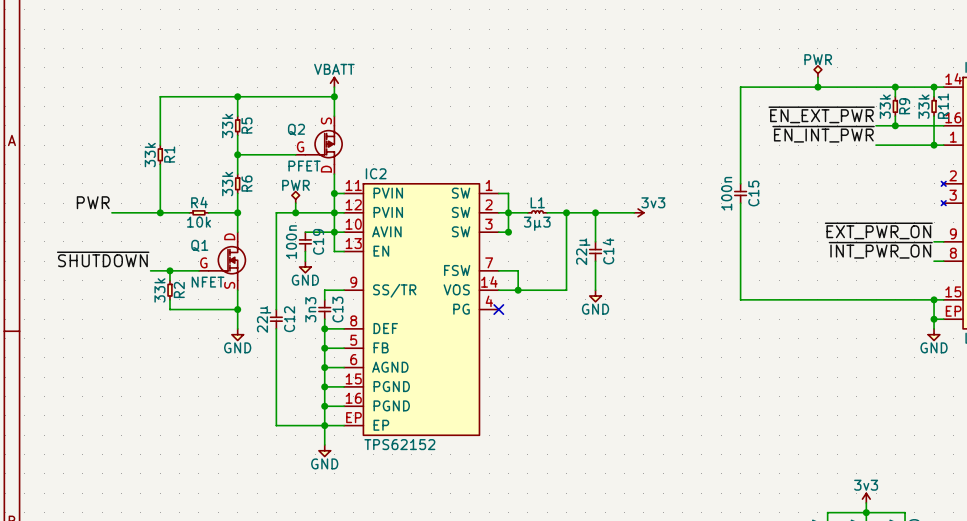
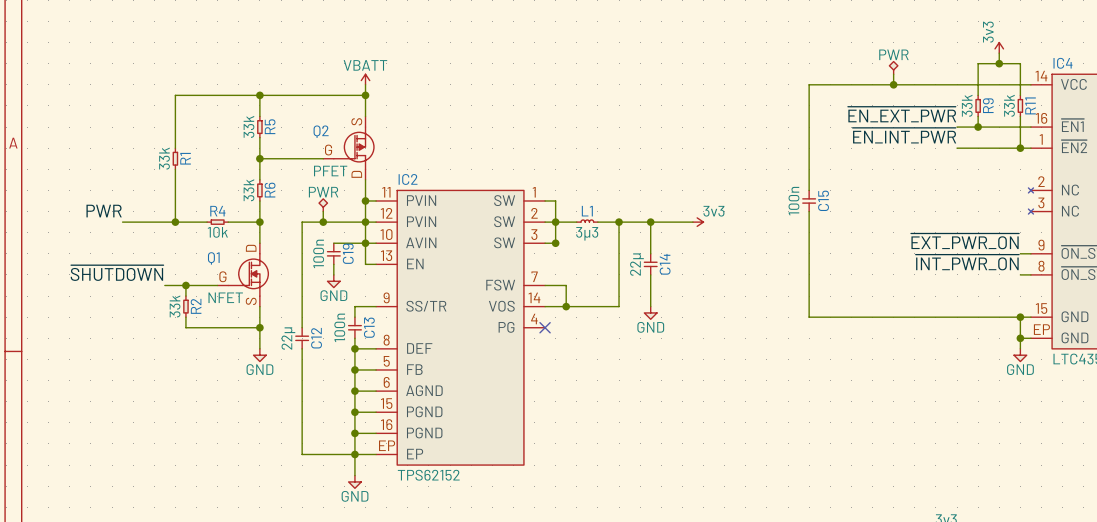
power symbol: none -> 3v3 (999, 47)
wire: none -> (999, 53) (999, 63)
junction: none -> (999, 63)
wire: none -> (978, 84) (978, 63) (1020, 63) (1020, 84)
junction: (895, 87) -> none
junction: (934, 87) -> none
C13 value: 3n3 (310, 309) -> 100n (339, 327)

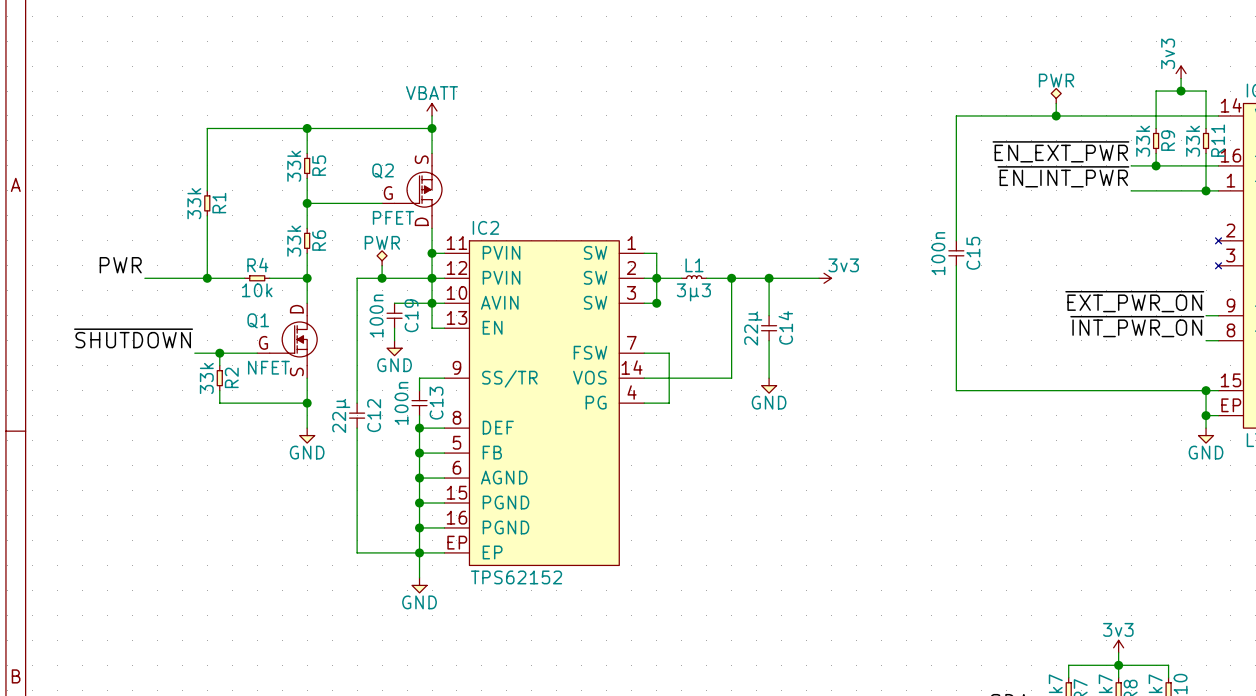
wire: none -> (669, 378) (669, 403) (644, 403)
junction: (566, 306) -> none
no-connect mark: (545, 327) -> none

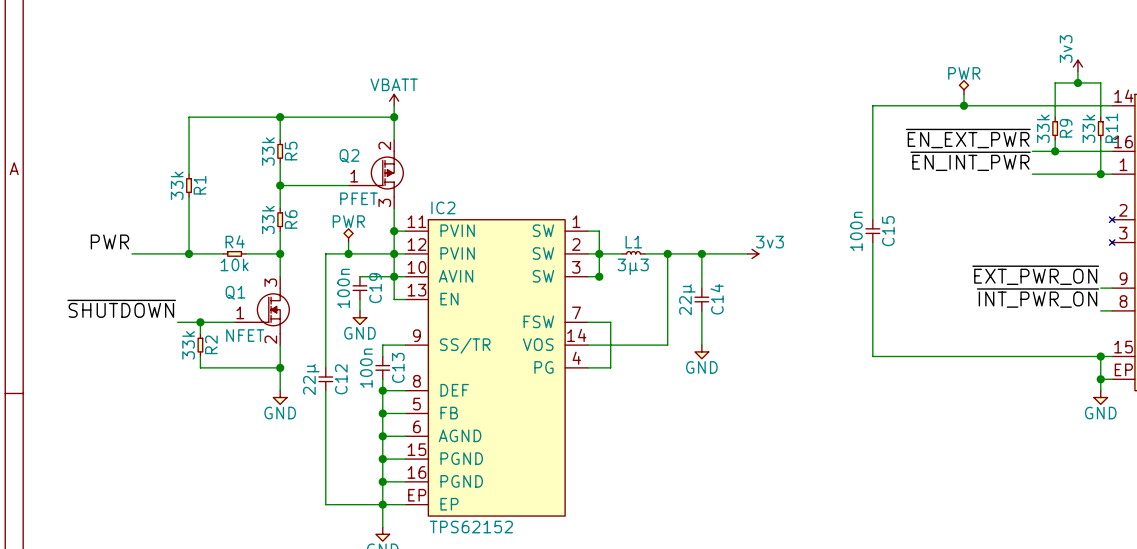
Q2 pin number: S (421, 159) -> 2 (384, 145)
Q2 pin number: G (388, 193) -> 1 (354, 176)
Q2 pin number: D (421, 221) -> 3 (384, 202)
Q1 pin number: D (296, 309) -> 3 (270, 282)
Q1 pin number: G (263, 342) -> 1 (240, 312)
Q1 pin number: S (296, 371) -> 2 (270, 339)

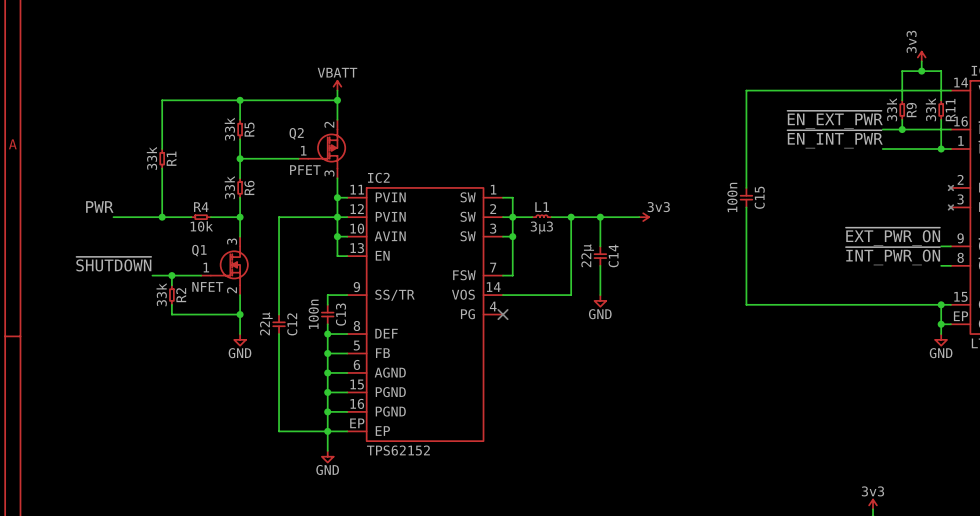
power symbol: PWR (963, 87) -> none
wire: (963, 94) (963, 105) -> none
junction: (963, 105) -> none
power symbol: PWR (348, 235) -> none
wire: (348, 242) (348, 253) -> none
junction: (348, 253) -> none
wire: (359, 276) (394, 276) -> none
C19: 100n (359, 288) -> none
wire: (359, 299) (359, 310) -> none
power symbol: GND (359, 317) -> none
wire: (599, 322) (610, 322) (610, 367) (587, 367) -> (512, 275) (512, 236)
no-connect mark: none -> (502, 314)

